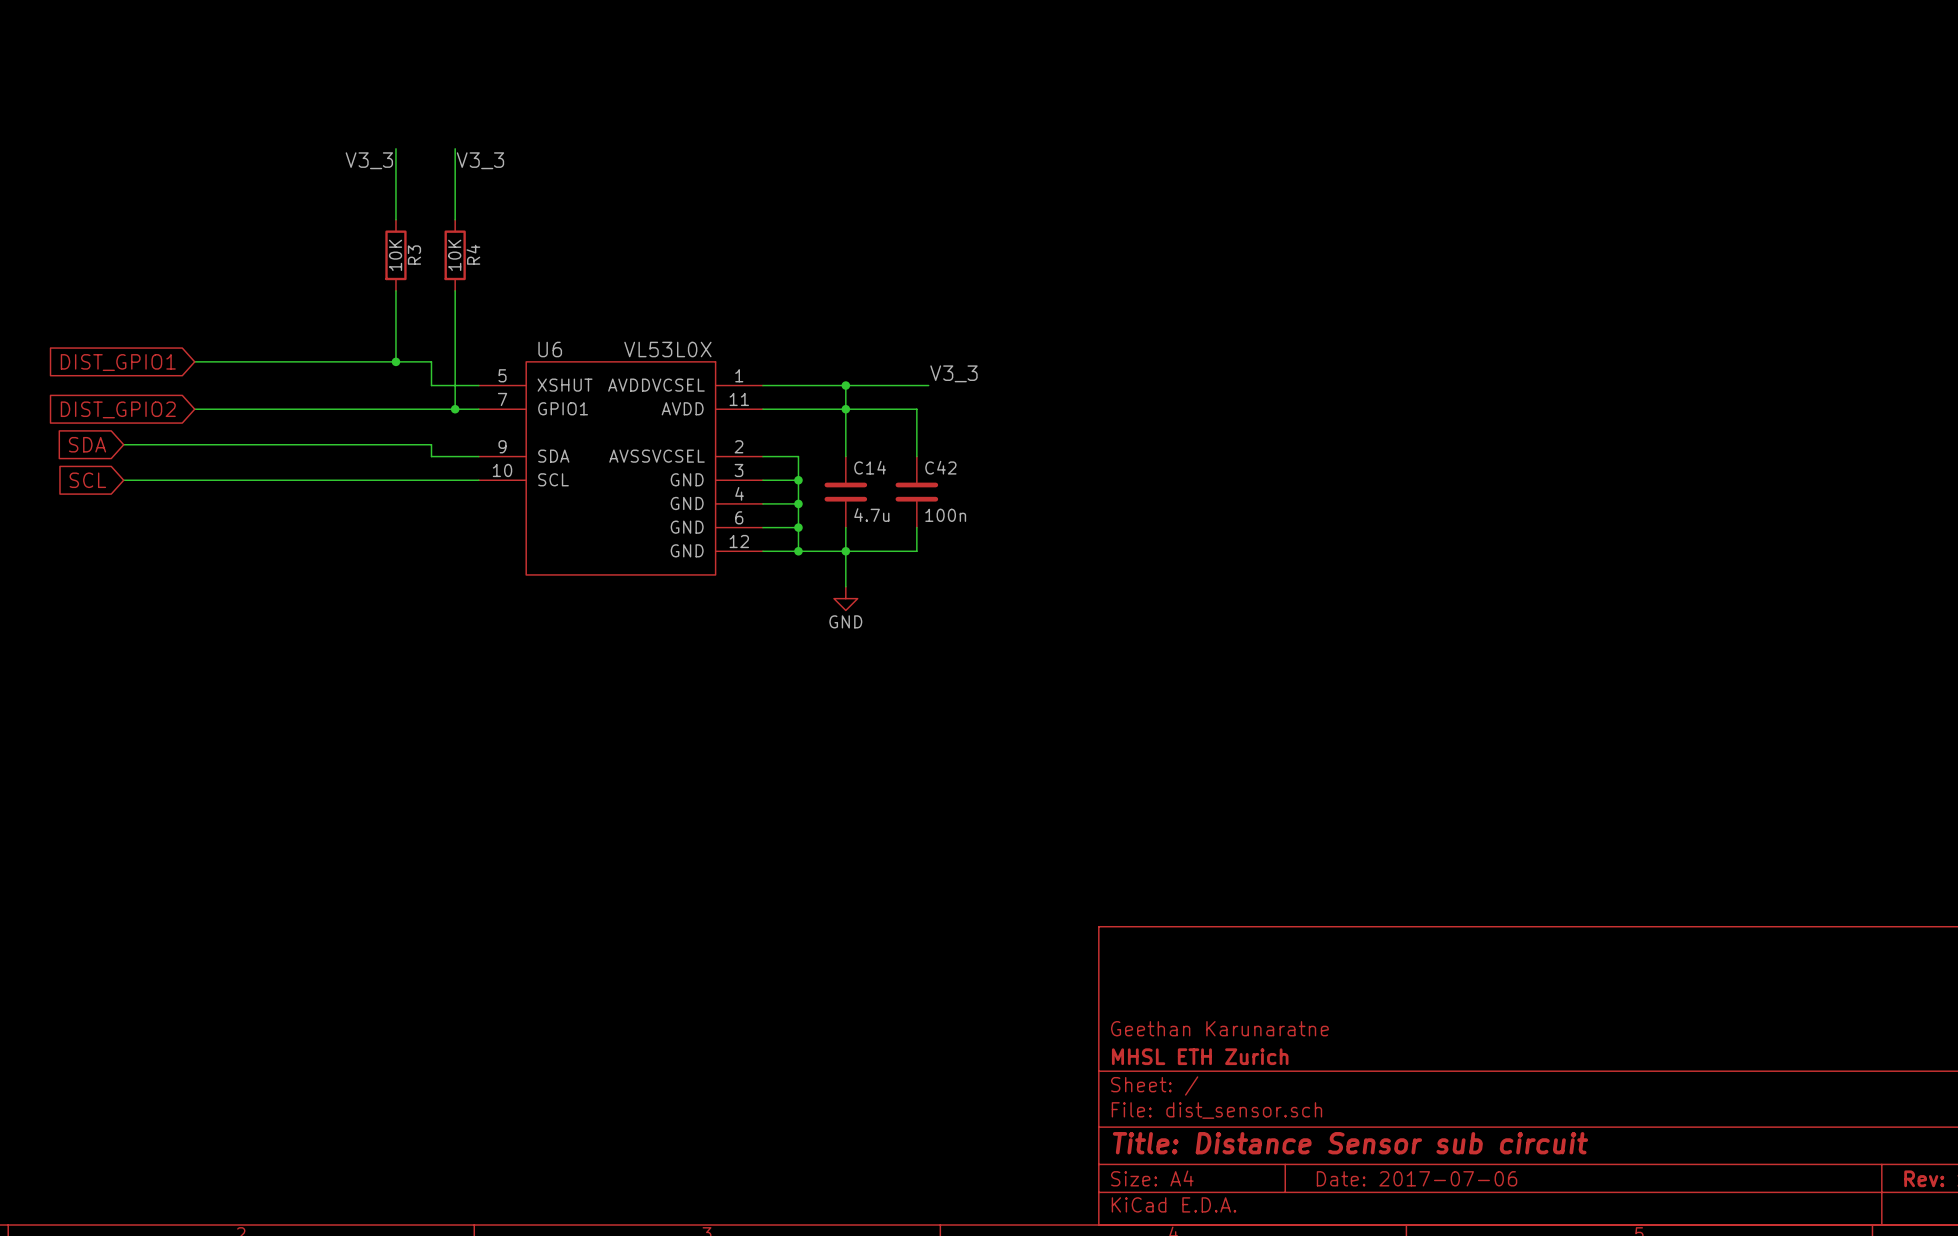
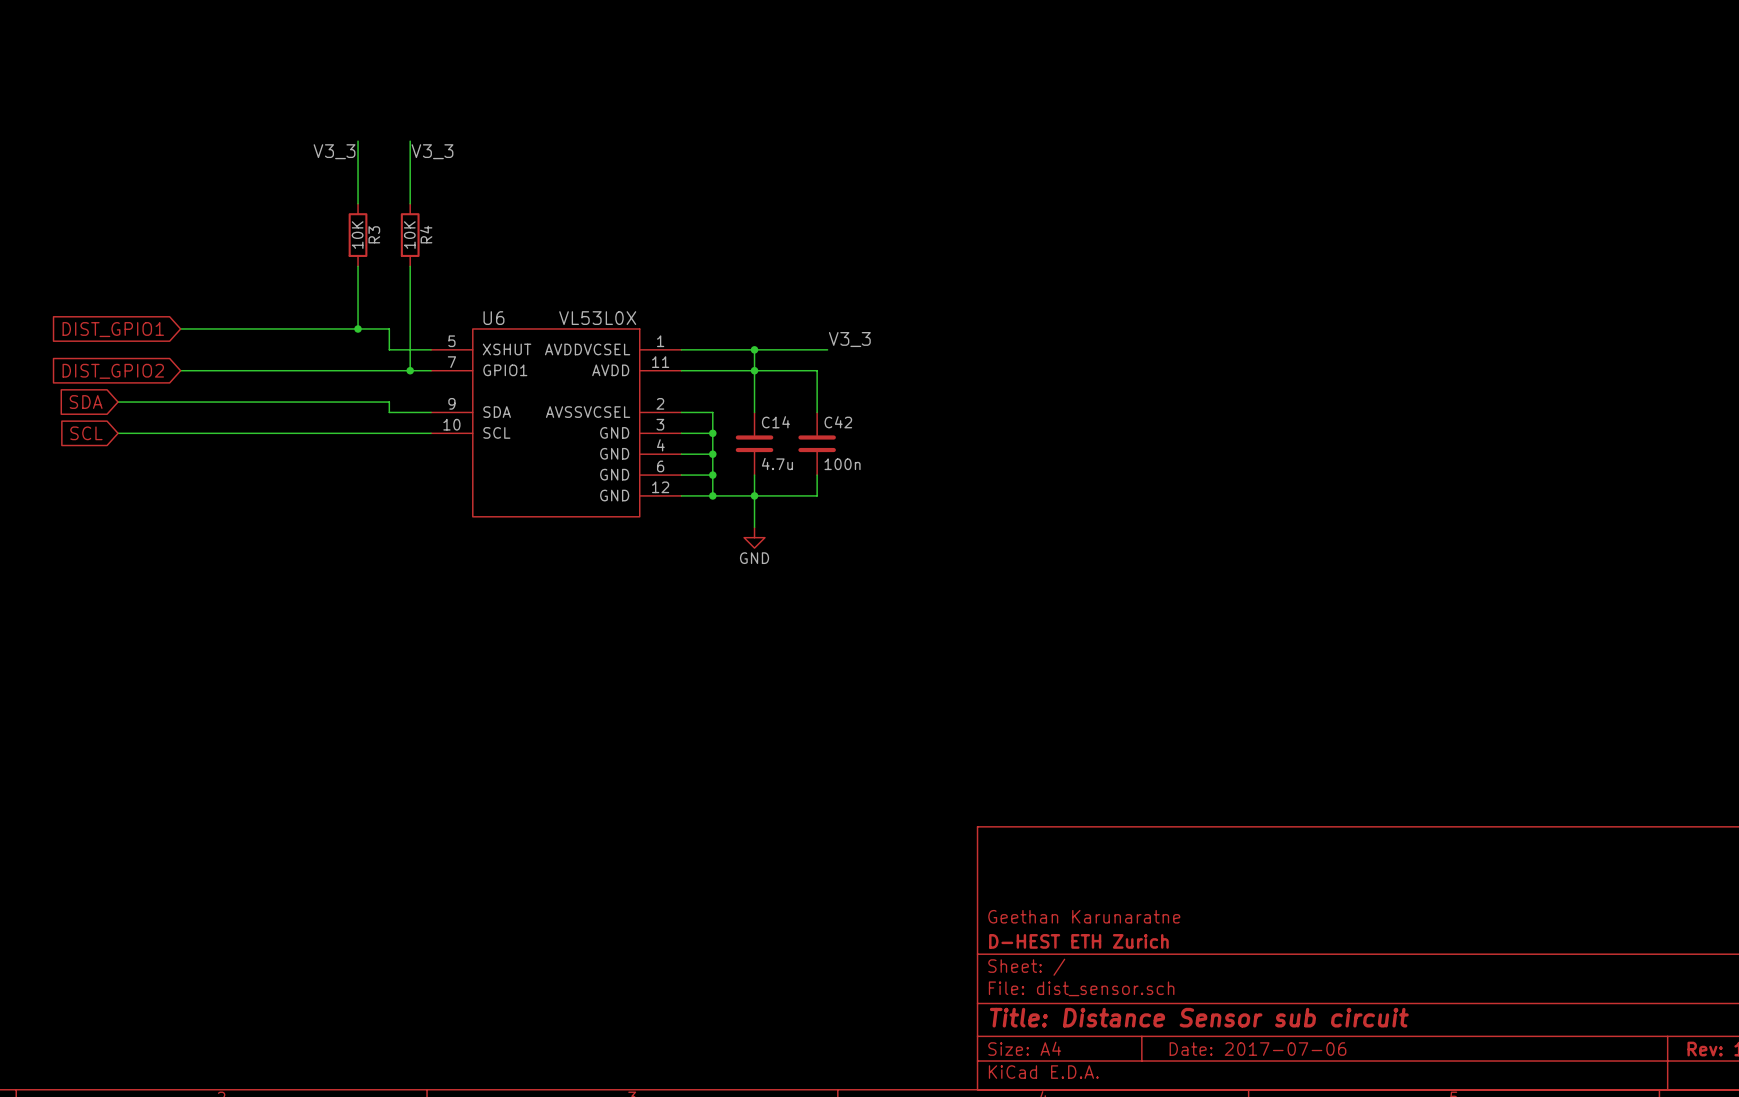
title block: MHSL ETH Zurich (1200, 1056) -> D-HEST ETH Zurich (1078, 941)

